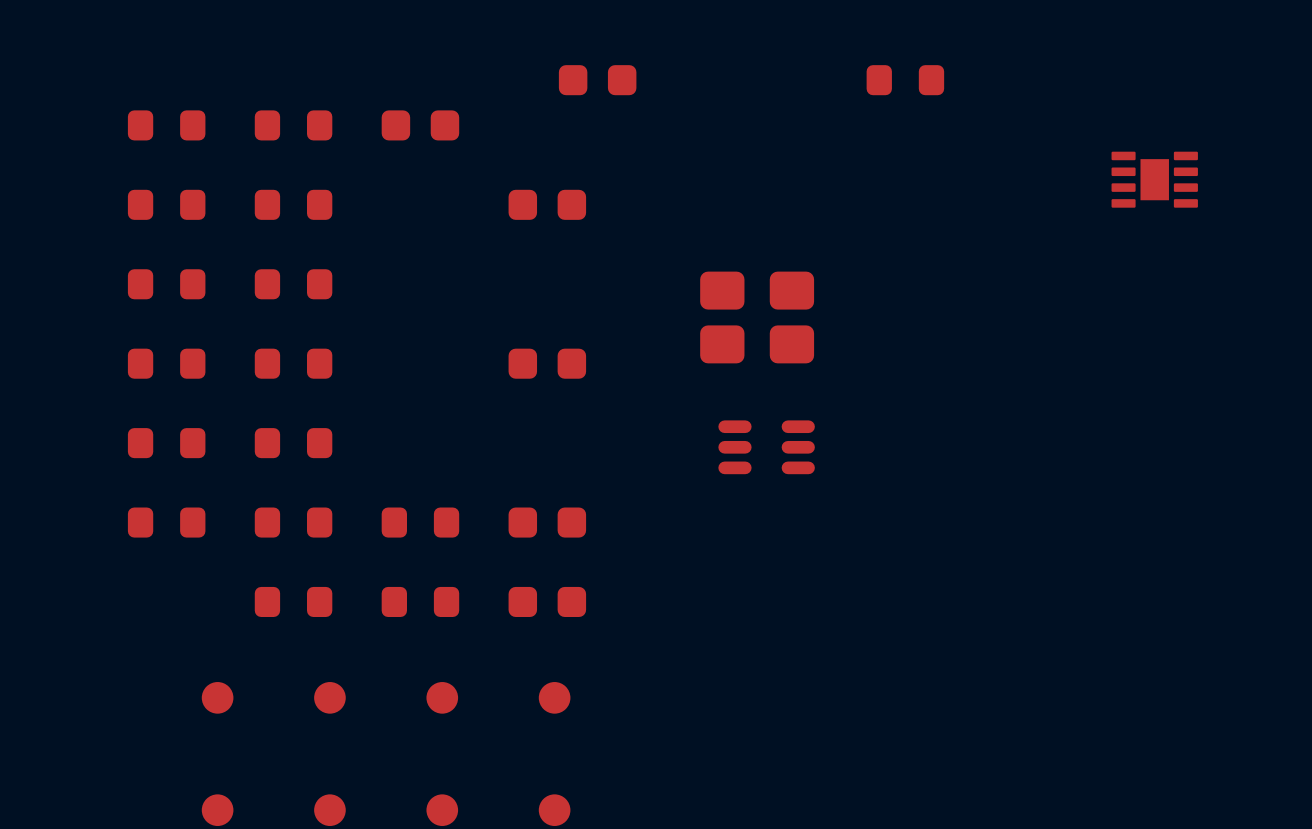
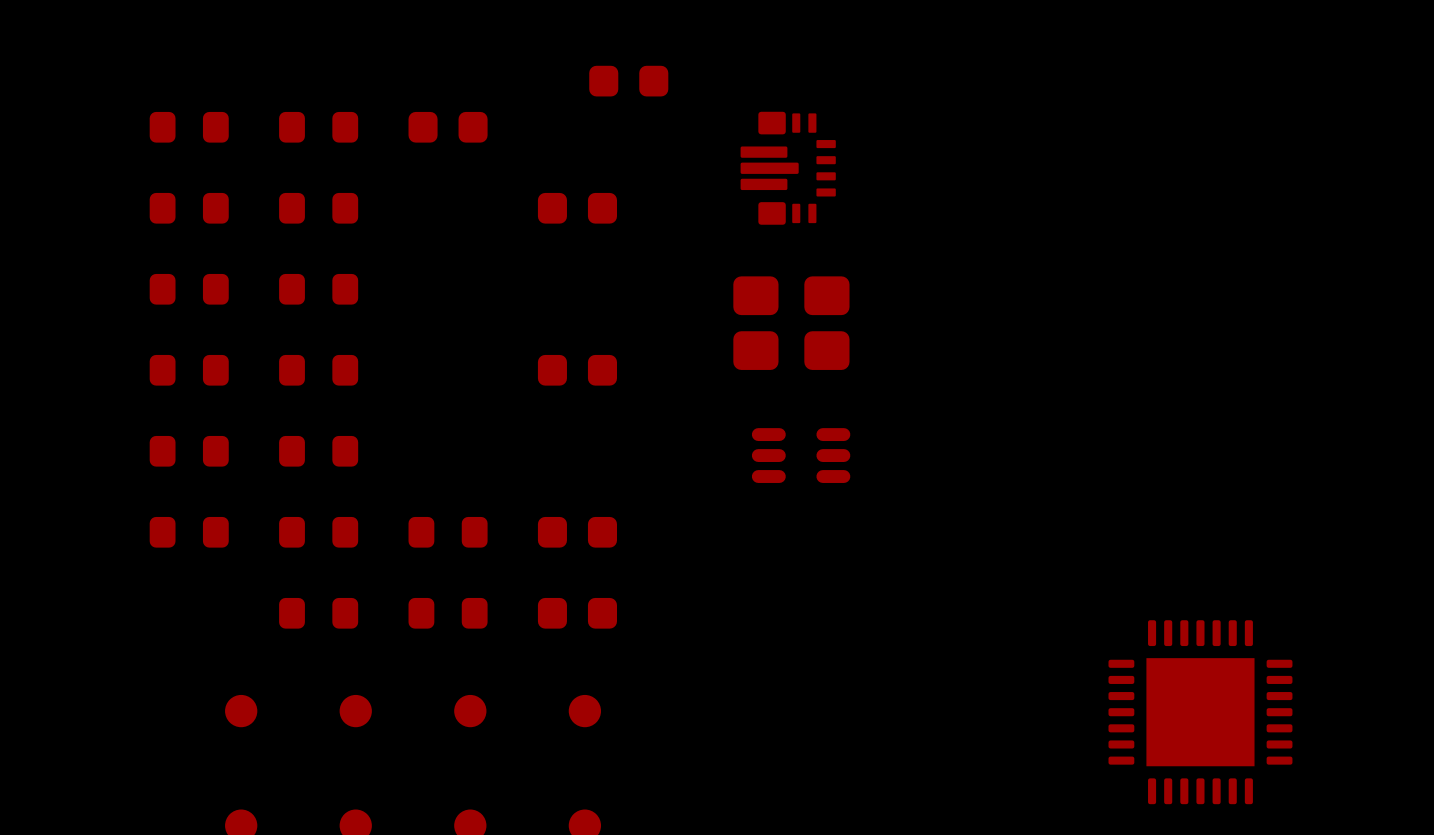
part: (905, 80) -> none
part: none -> (788, 168)
part: (1154, 179) -> none
part: none -> (1200, 712)

